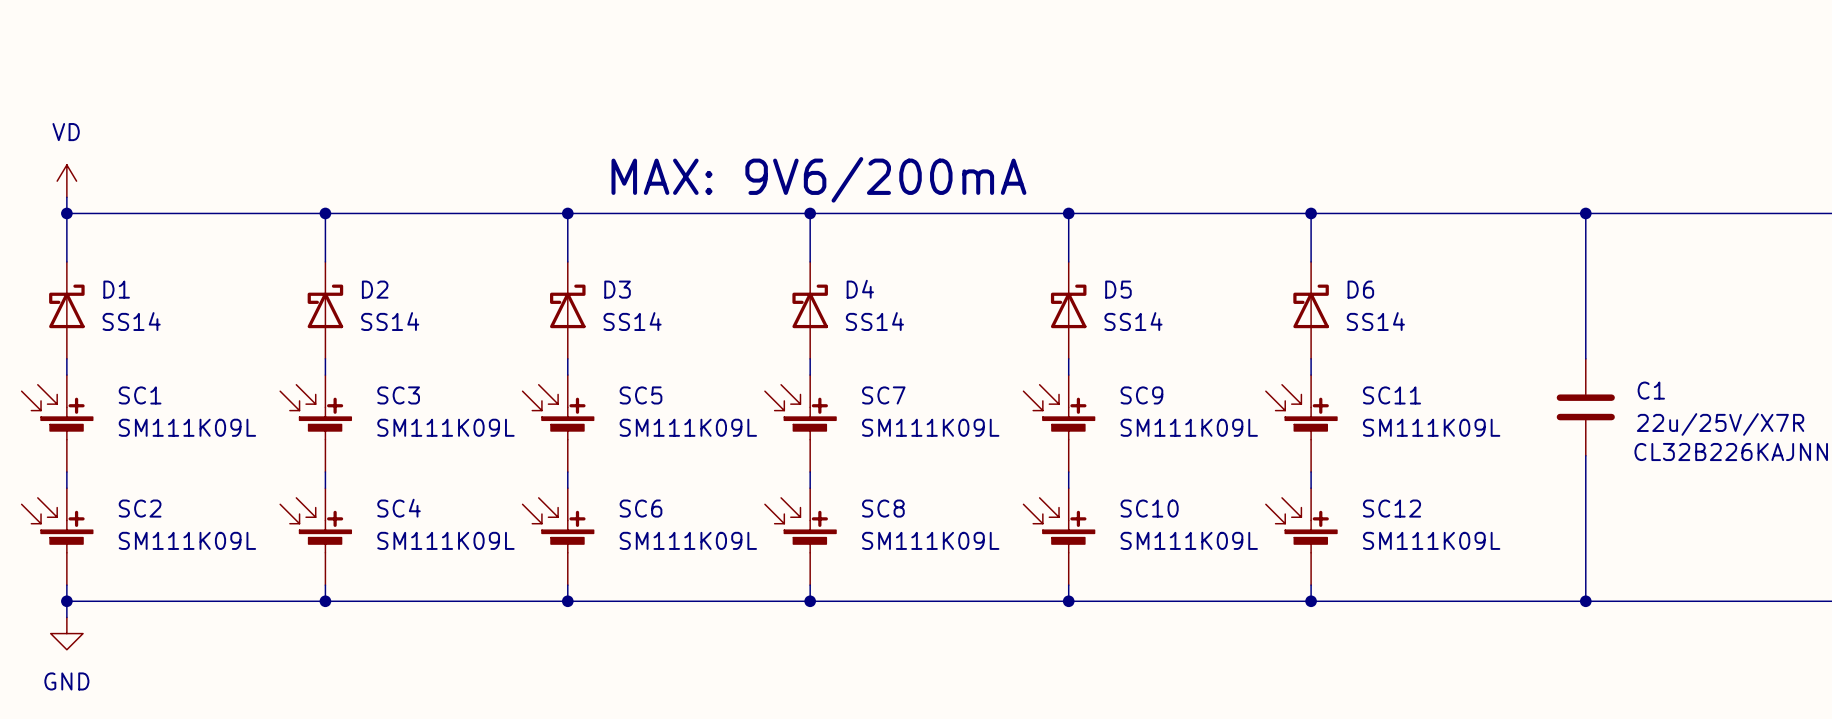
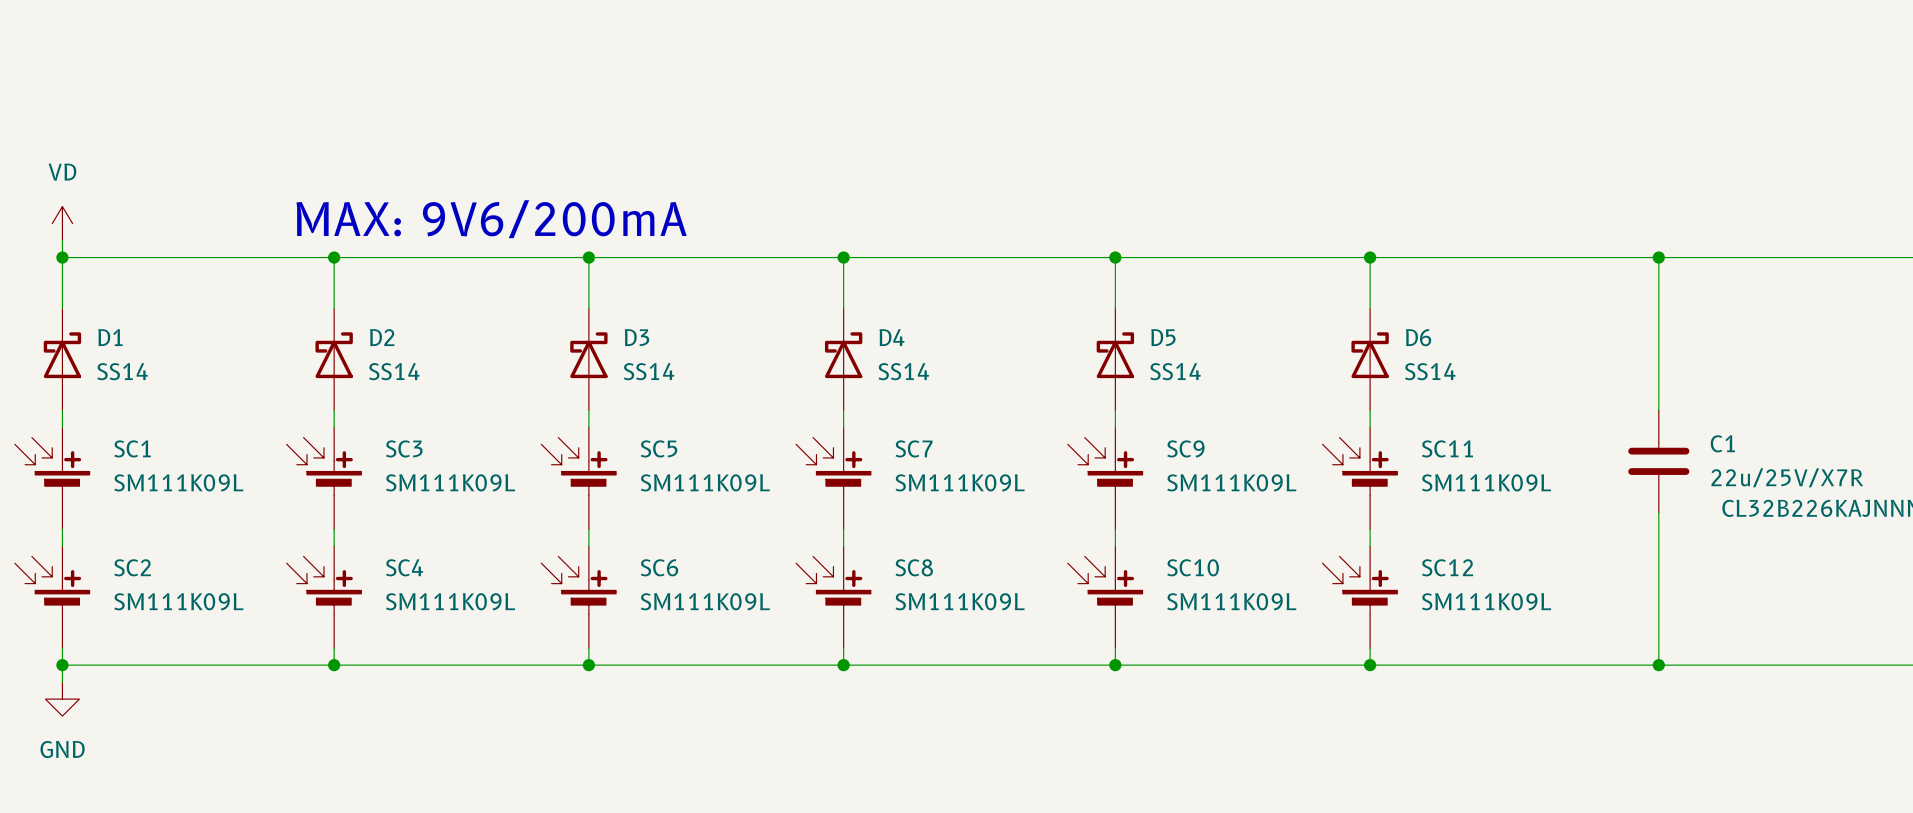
text: none -> MAX: 9V6/200mA (491, 219)
text: MAX: 9V6/200mA (818, 179) -> none

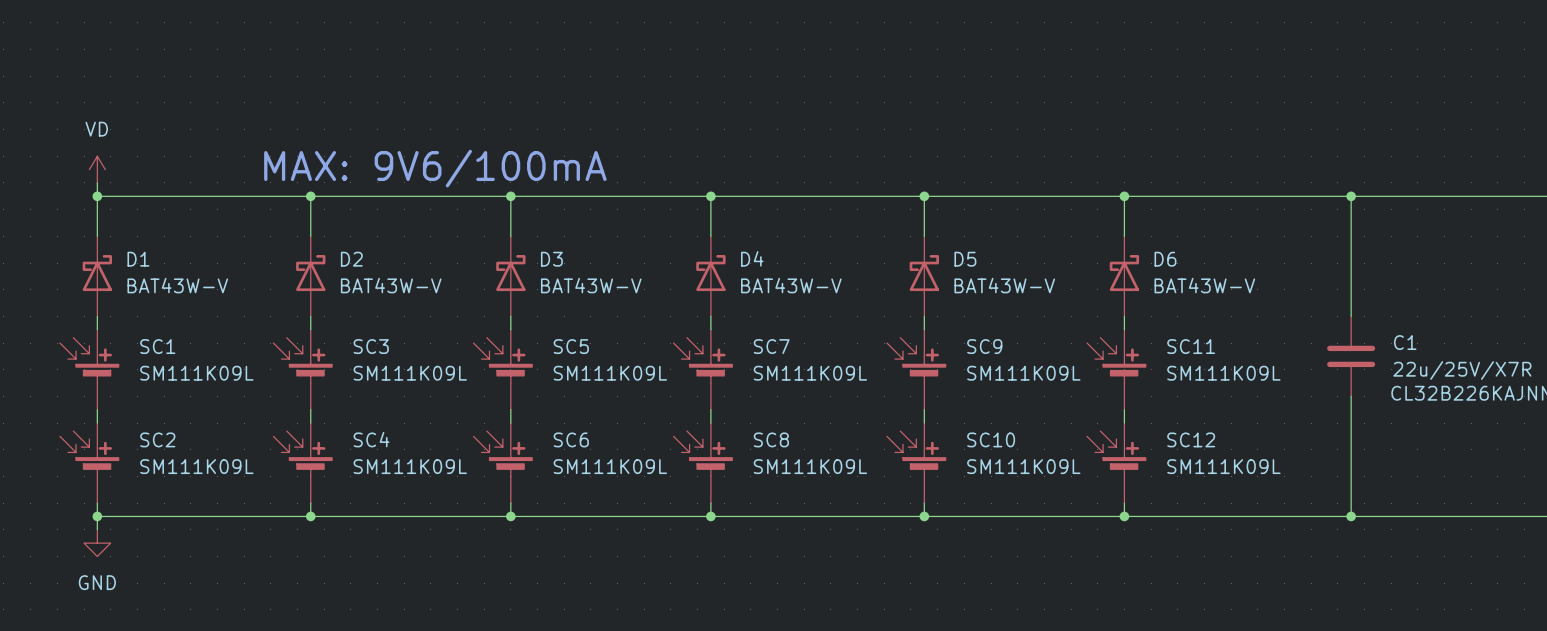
text: MAX: 9V6/200mA (491, 219) -> MAX: 9V6/100mA (435, 168)
D1 value: SS14 (122, 371) -> BAT43W-V (177, 285)
D2 value: SS14 (394, 371) -> BAT43W-V (391, 285)
D3 value: SS14 (649, 371) -> BAT43W-V (591, 285)
D4 value: SS14 (903, 371) -> BAT43W-V (791, 285)
D5 value: SS14 (1175, 371) -> BAT43W-V (1004, 285)
D6 value: SS14 (1430, 371) -> BAT43W-V (1204, 285)

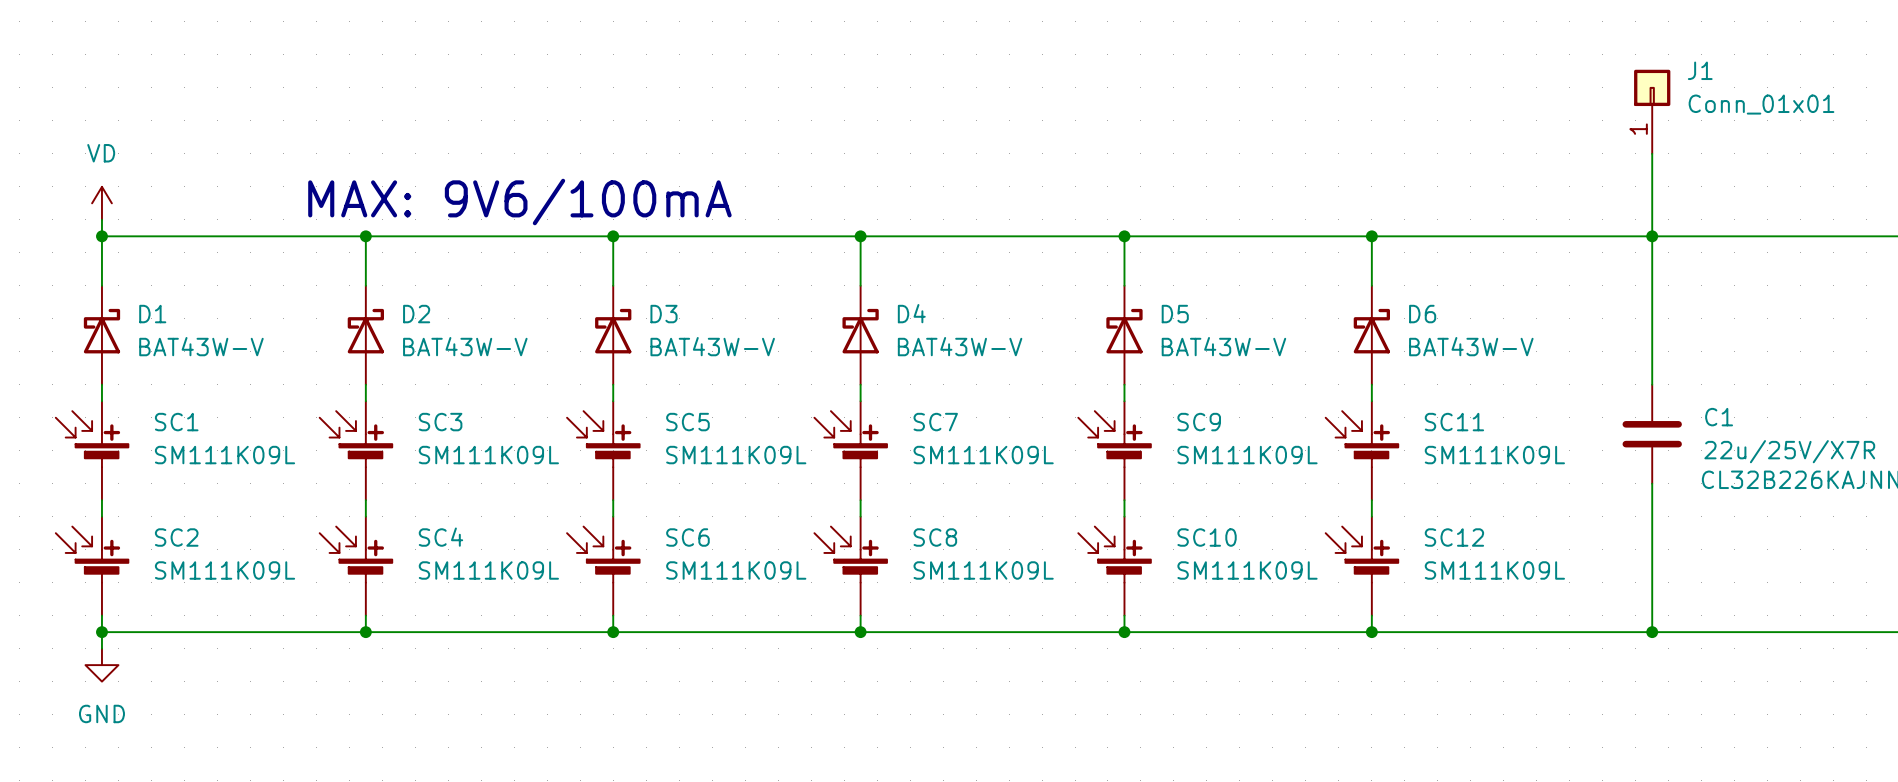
J1: none -> Conn_01x01 (1652, 111)
wire: none -> (1652, 153) (1652, 236)

